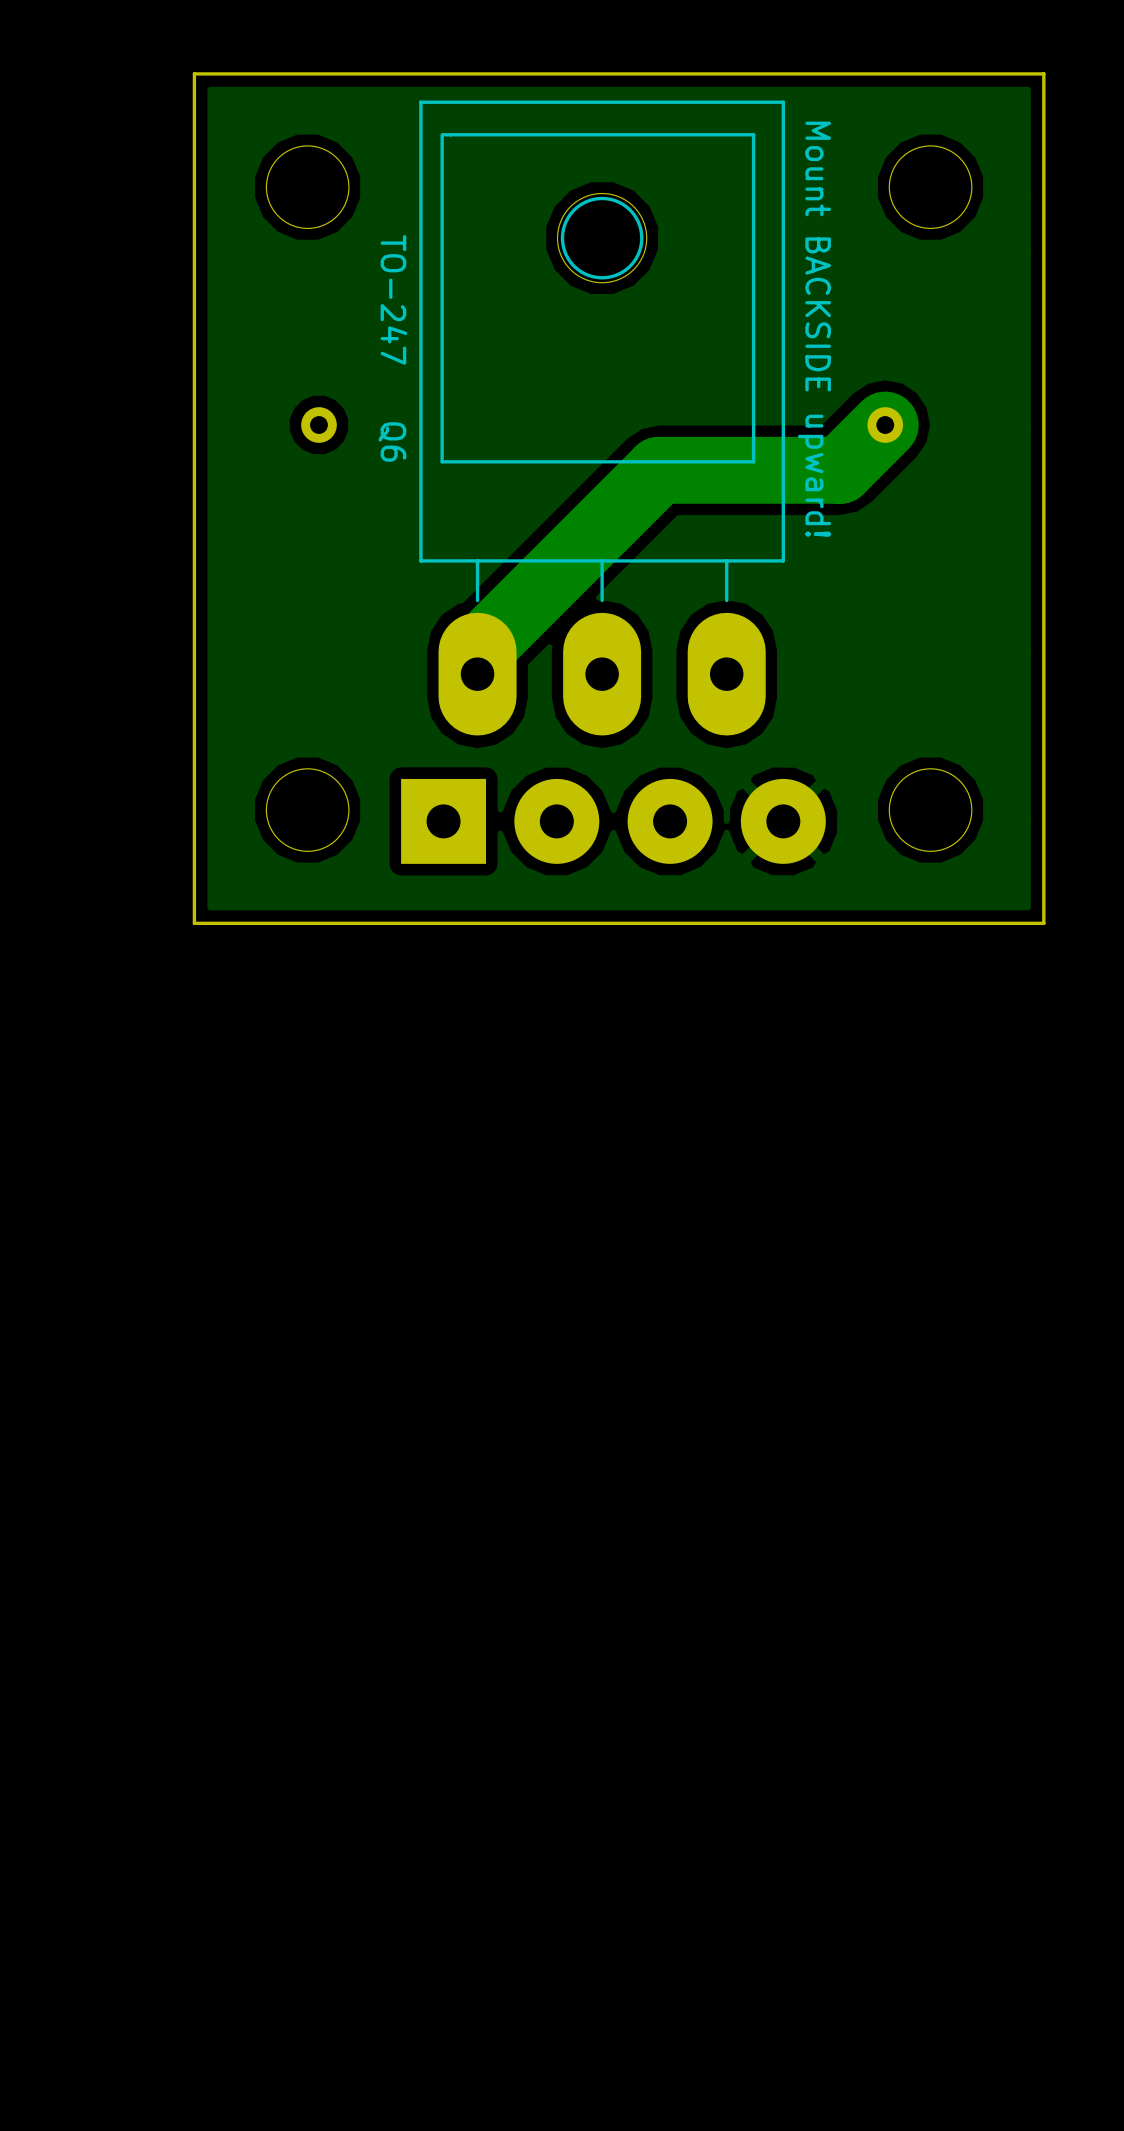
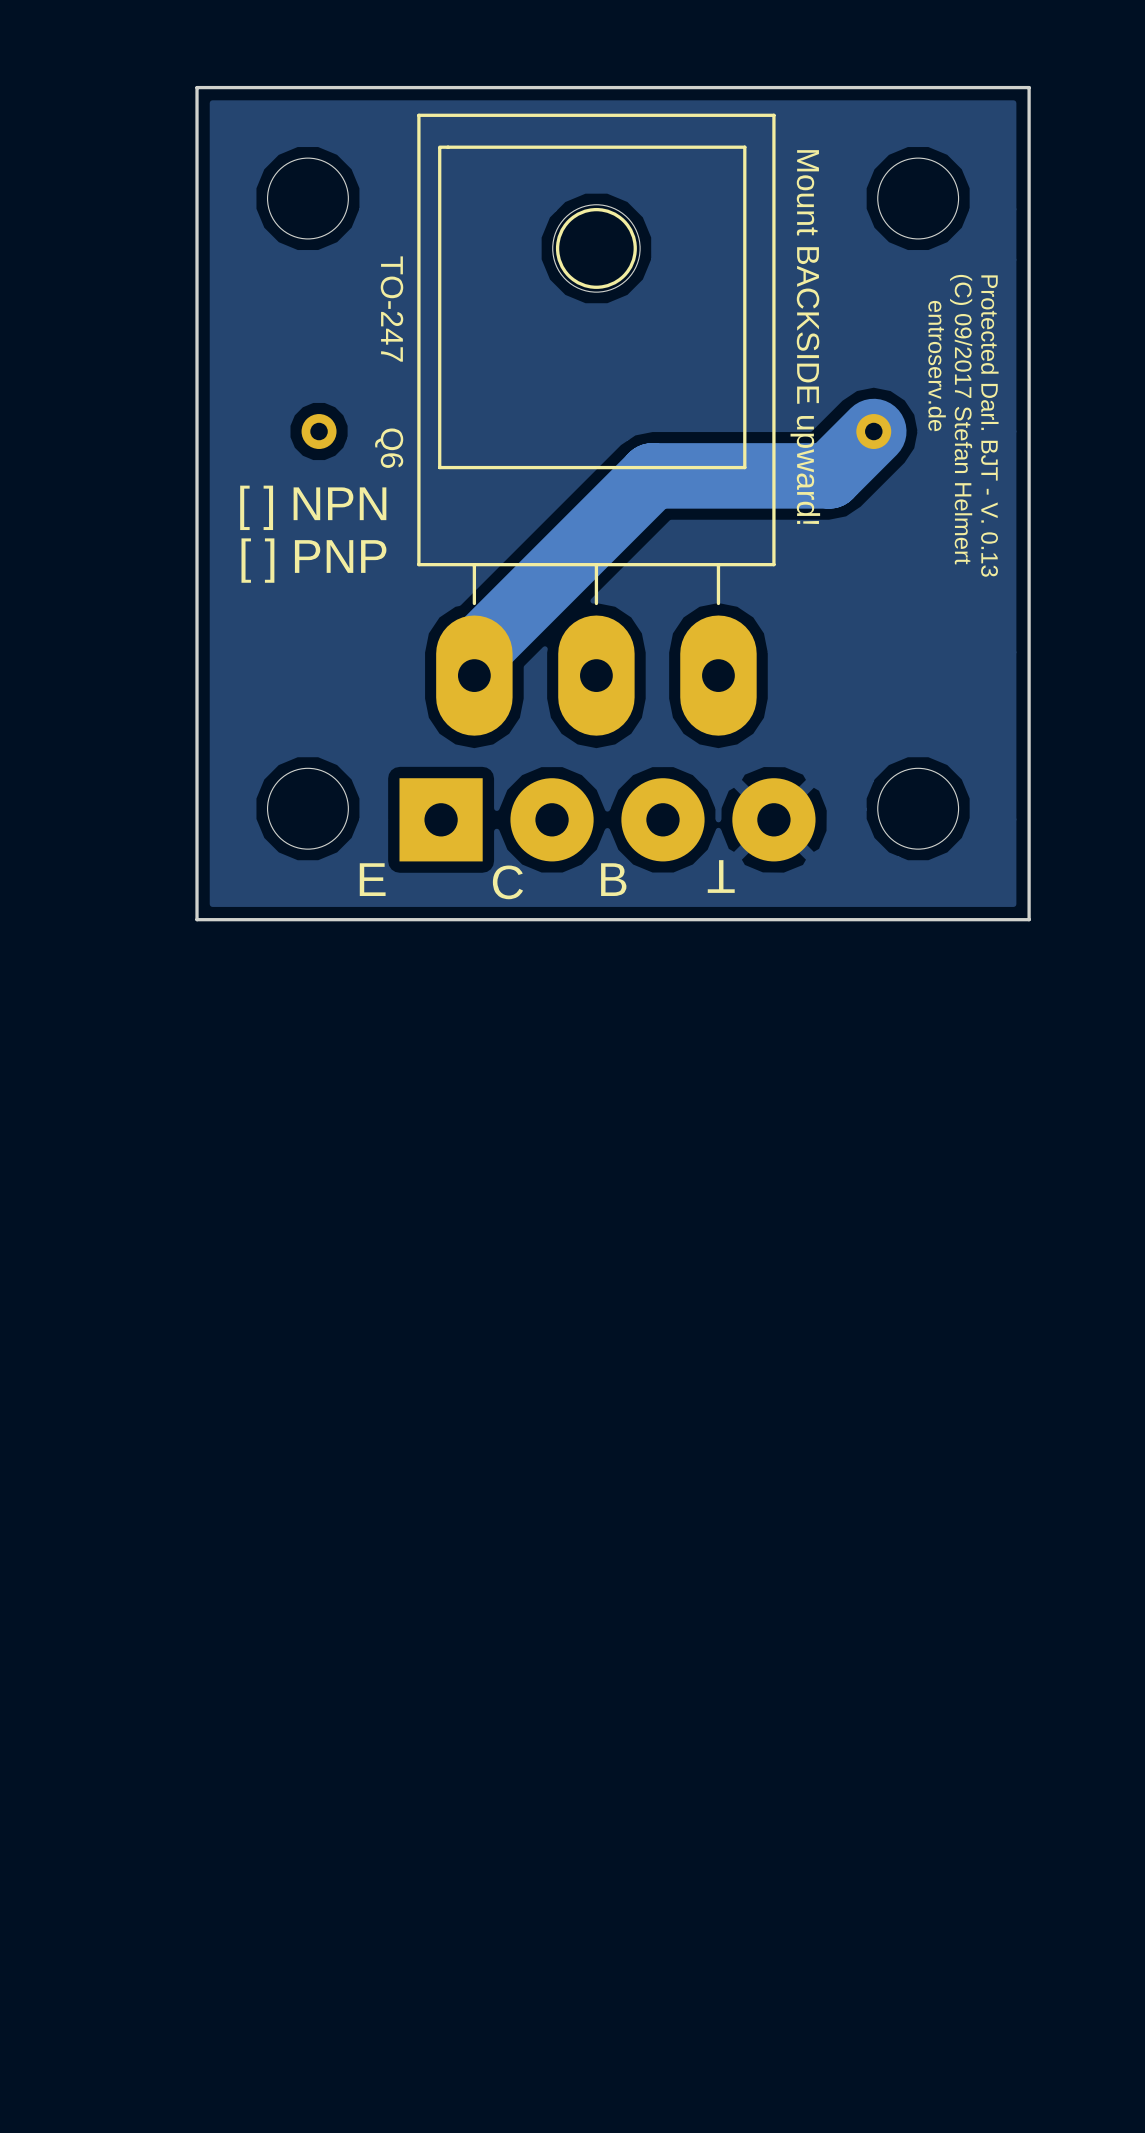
text: none -> entroserv.de (937, 366)
text: none -> (C) 09/2017 Stefan Helmert (961, 419)
text: none -> Protected Darl. BJT - V. 0.13 (989, 426)
text: none -> [ ] NPN (313, 507)
text: none -> [ ] PNP (313, 560)
text: none -> T (721, 876)
text: none -> E (372, 879)
text: none -> B (613, 879)
text: none -> C (507, 882)

